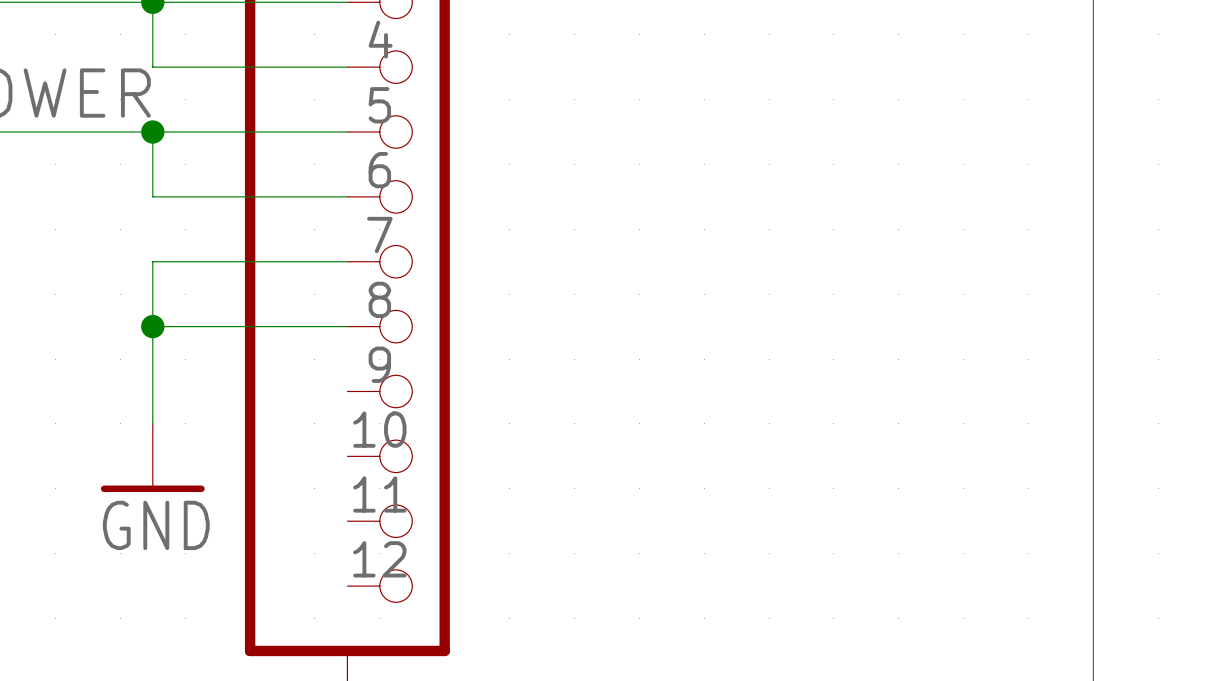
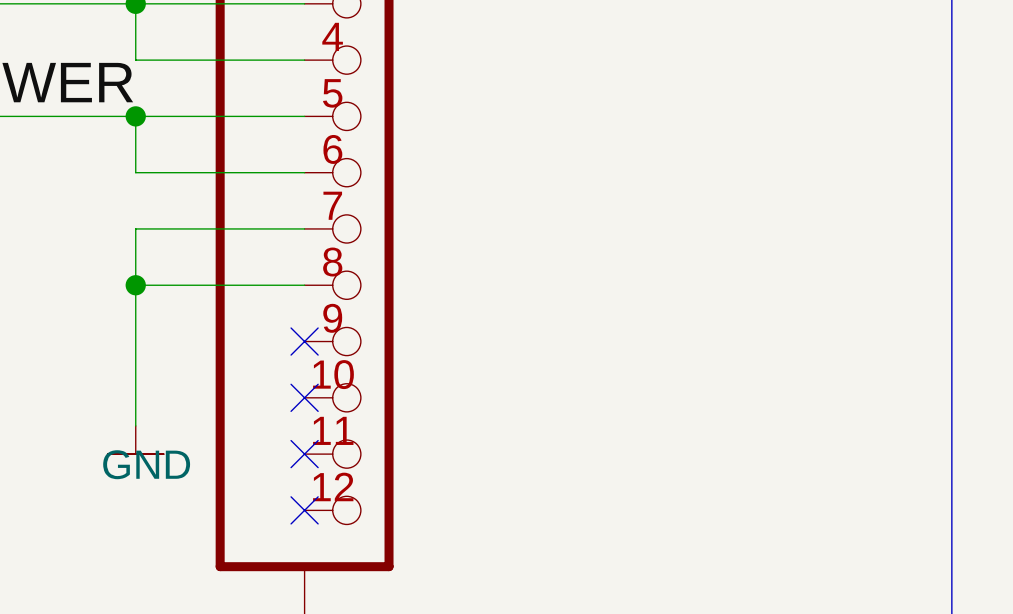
no-connect mark: none -> (304, 341)
no-connect mark: none -> (304, 397)
power symbol: GND (152, 457) -> none
power symbol: none -> GND (135, 440)
no-connect mark: none -> (304, 454)
no-connect mark: none -> (304, 510)

